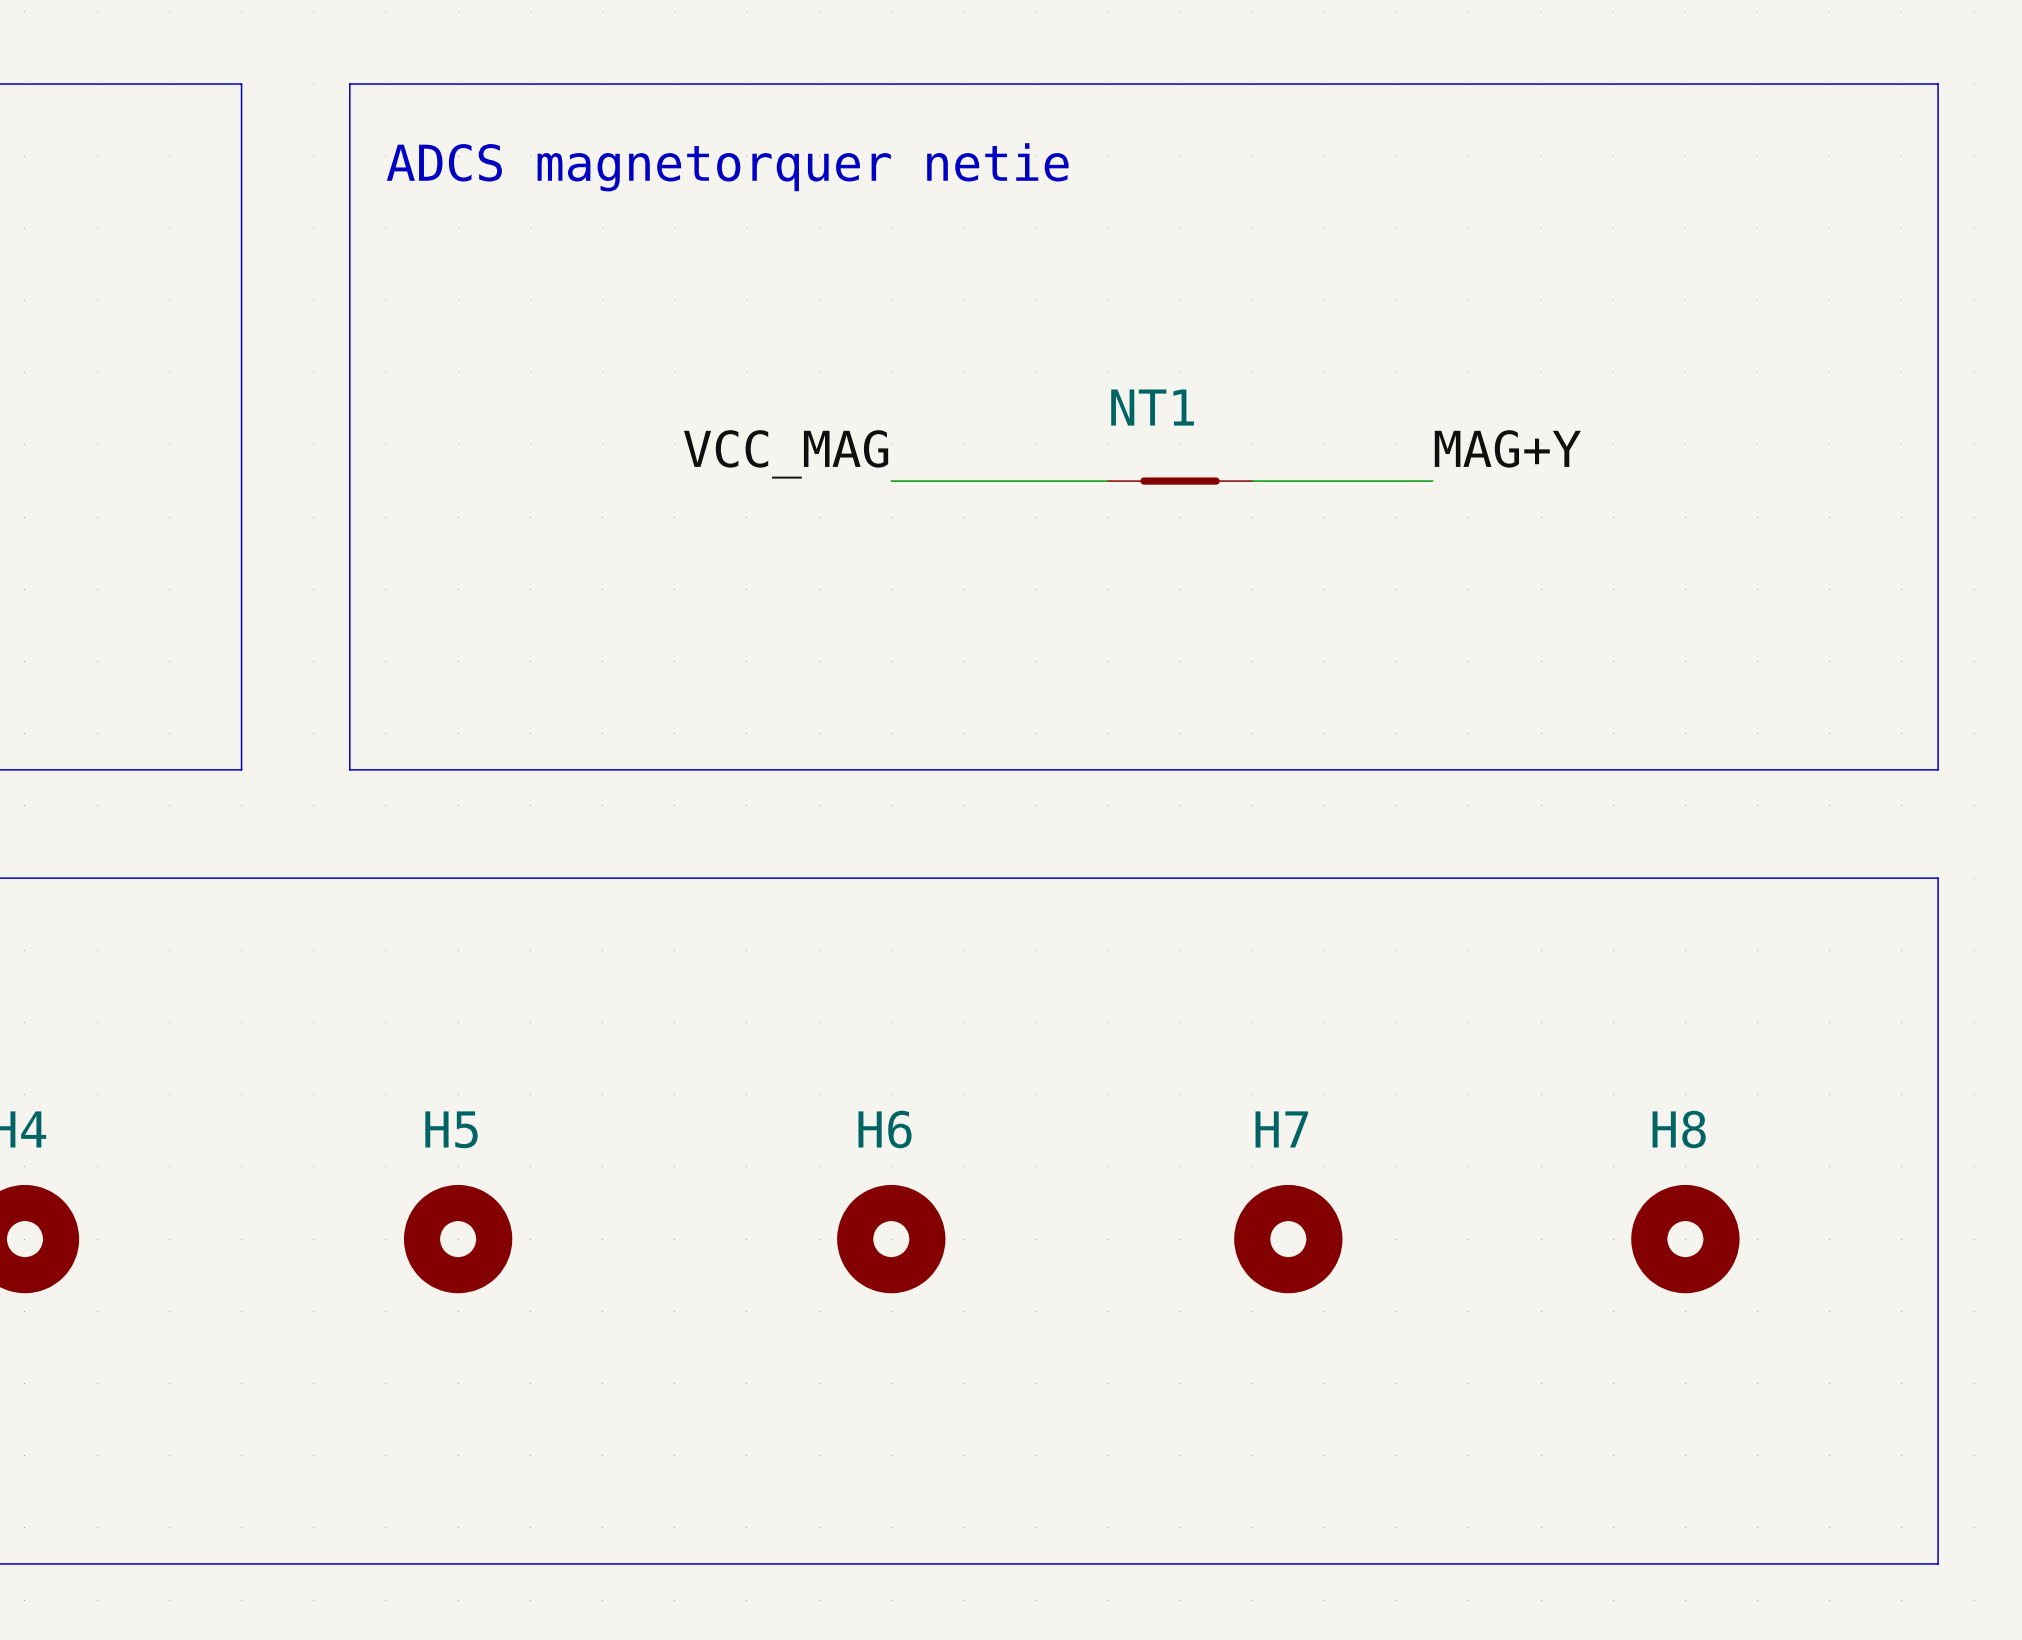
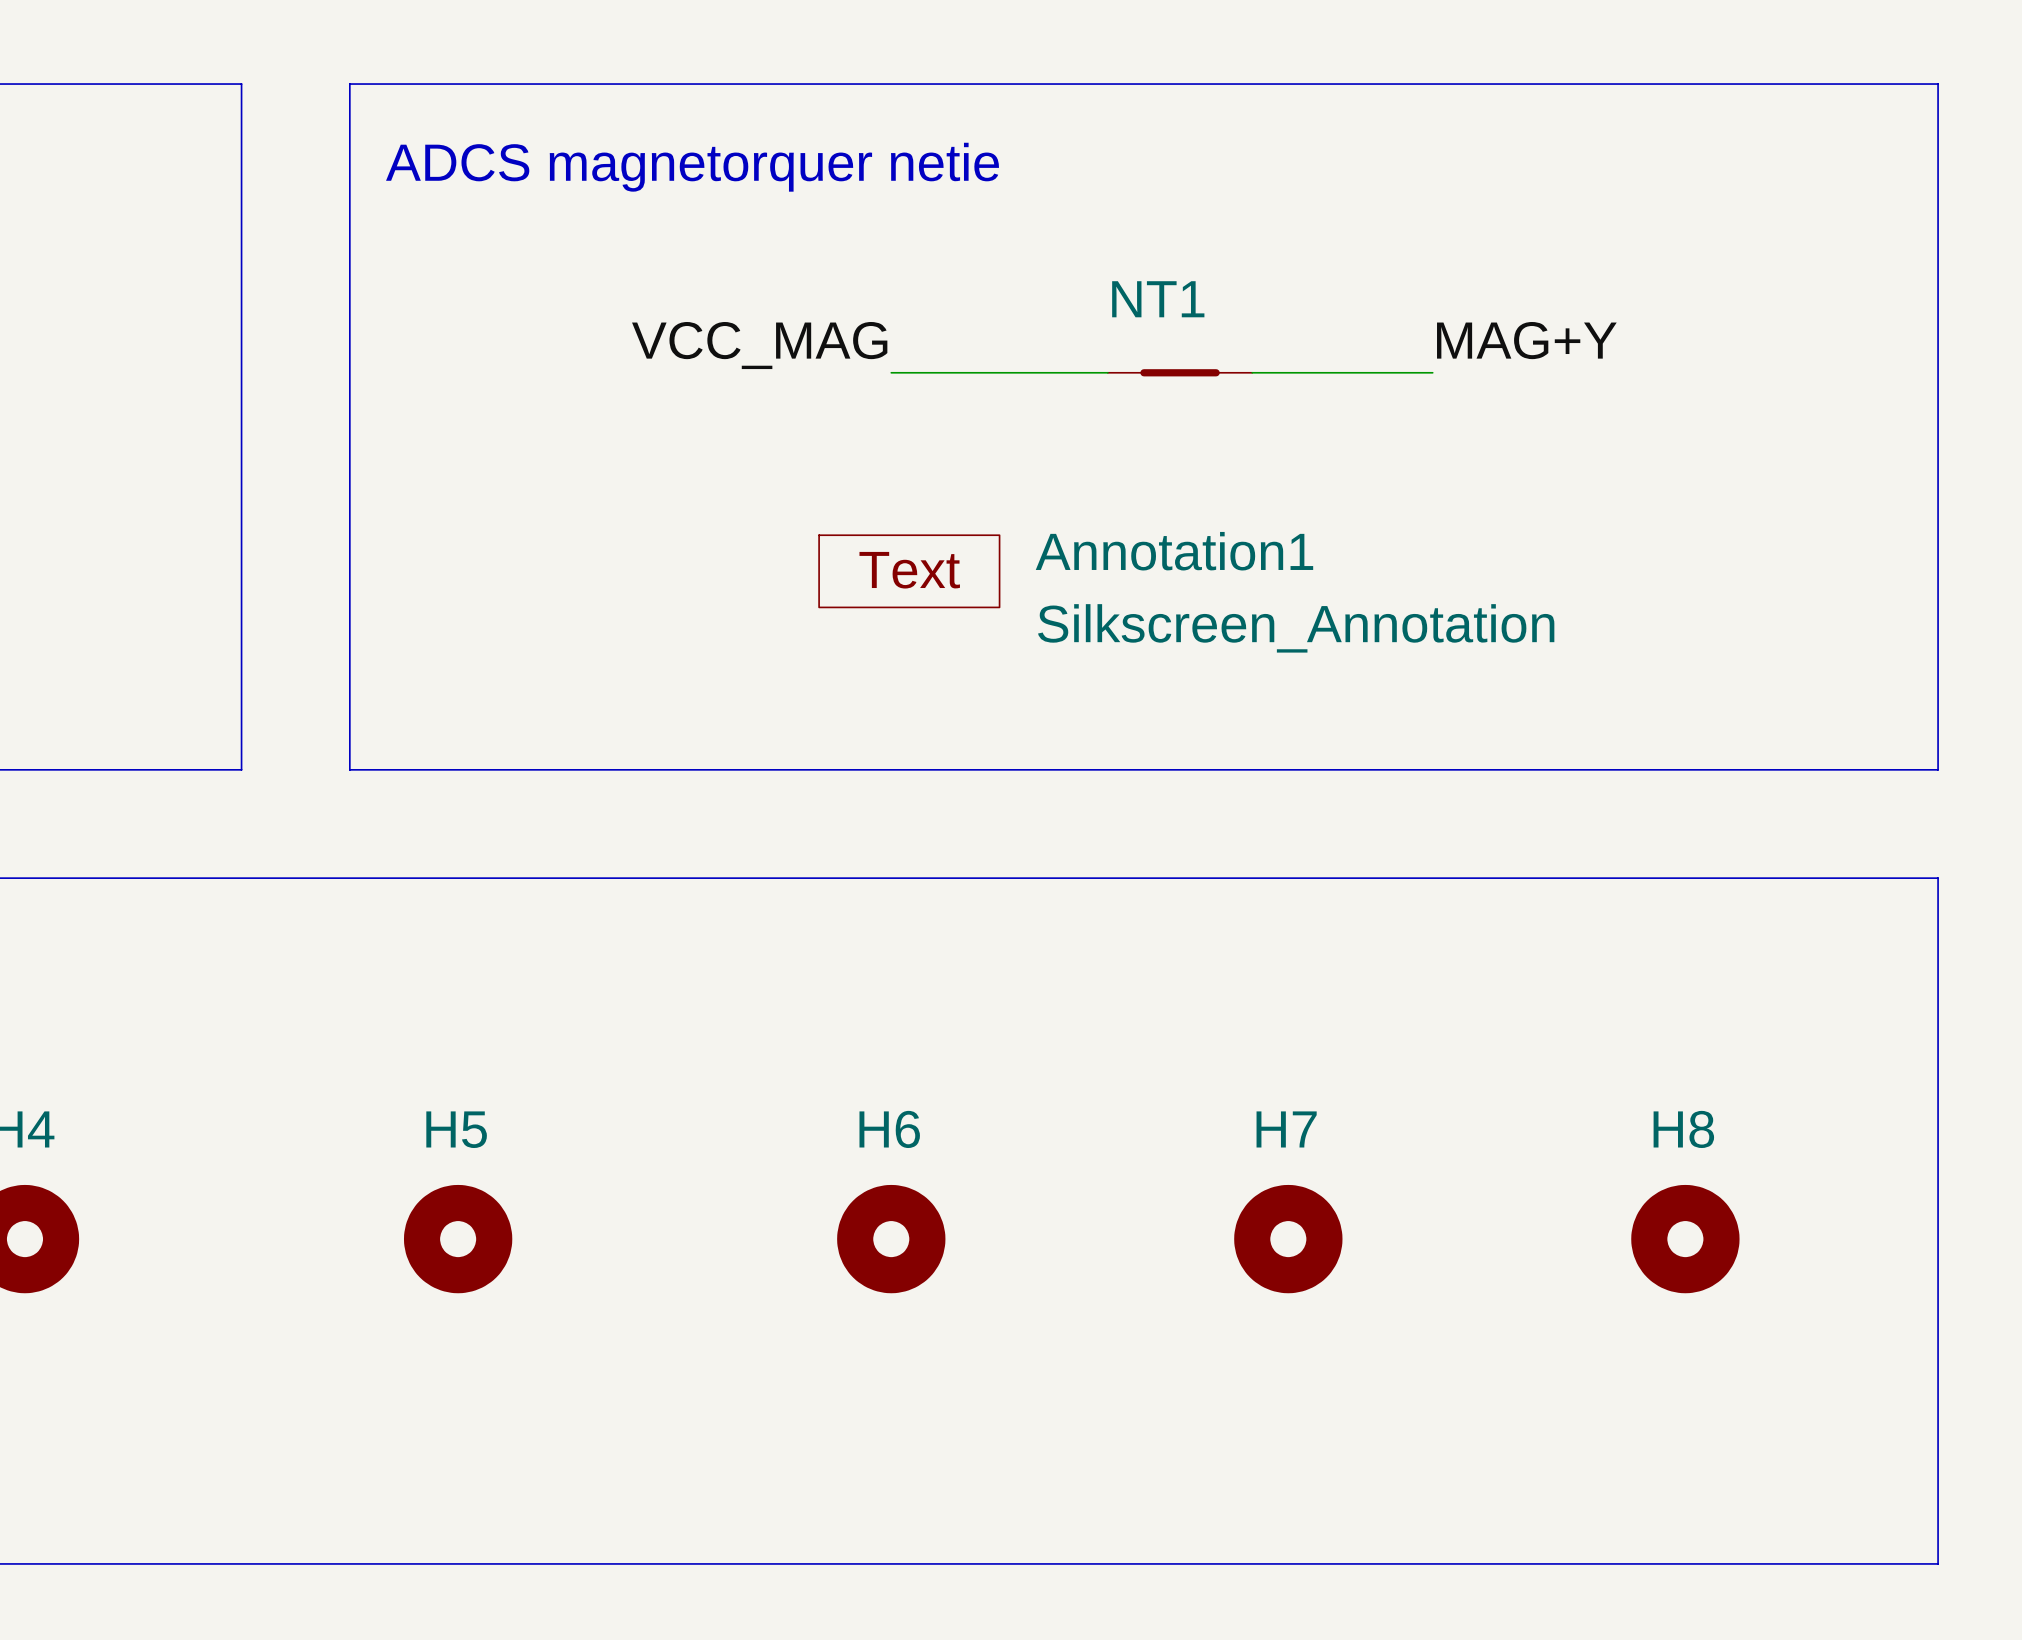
label position: MAG+Y (1507, 448) -> MAG+Y (1526, 340)
label position: VCC_MAG (786, 454) -> VCC_MAG (759, 345)
wire: (891, 481) (1107, 481) -> (891, 372) (1107, 372)
NT1 position: (1180, 481) -> (1180, 372)
wire: (1252, 481) (1432, 481) -> (1252, 372) (1432, 372)
Annotation1: none -> Silkscreen_Annotation (909, 571)

